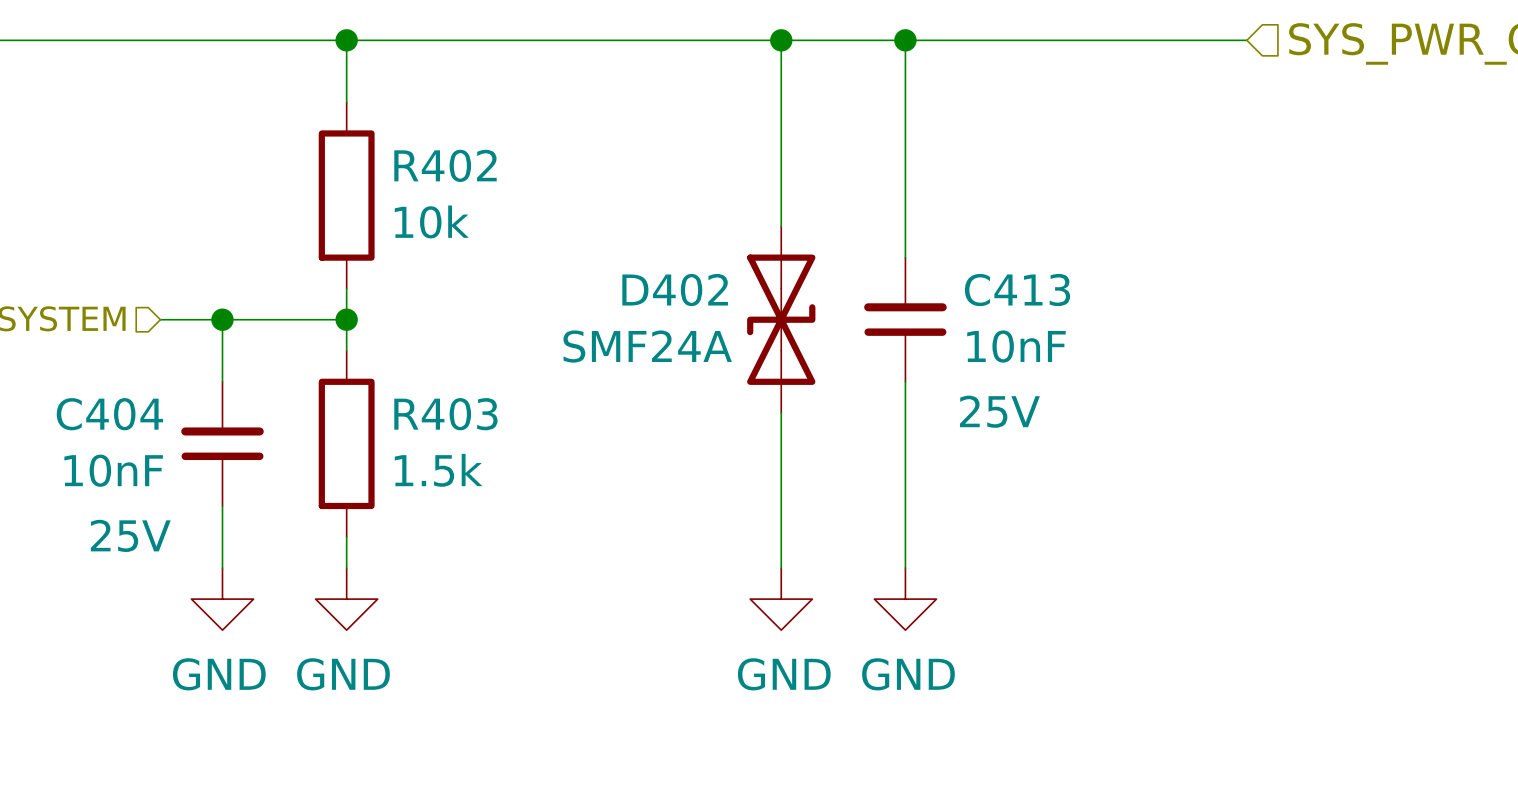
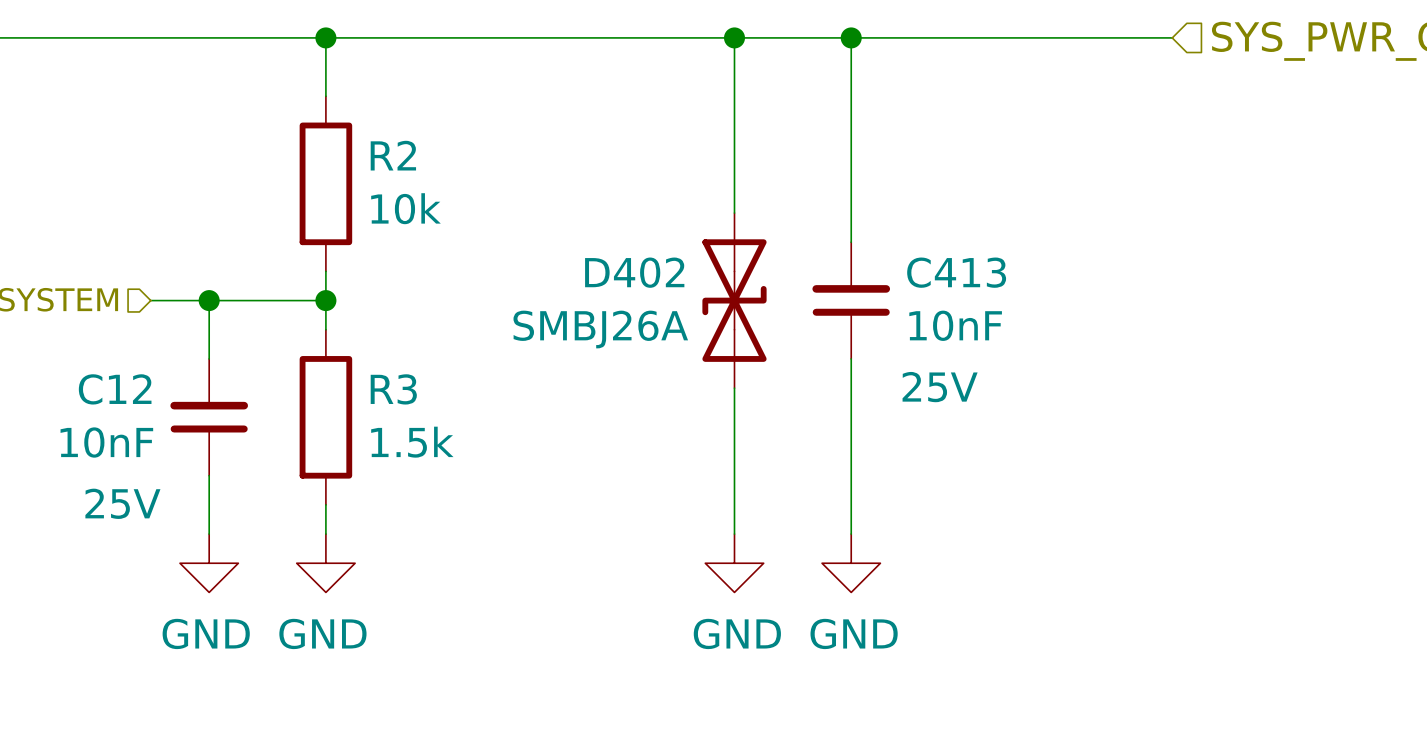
R402 name: R402 (445, 165) -> R2 (393, 155)
D402 value: SMF24A (647, 346) -> SMBJ26A (600, 329)
C404 name: C404 (109, 414) -> C12 (115, 389)
R403 name: R403 (445, 414) -> R3 (393, 389)

